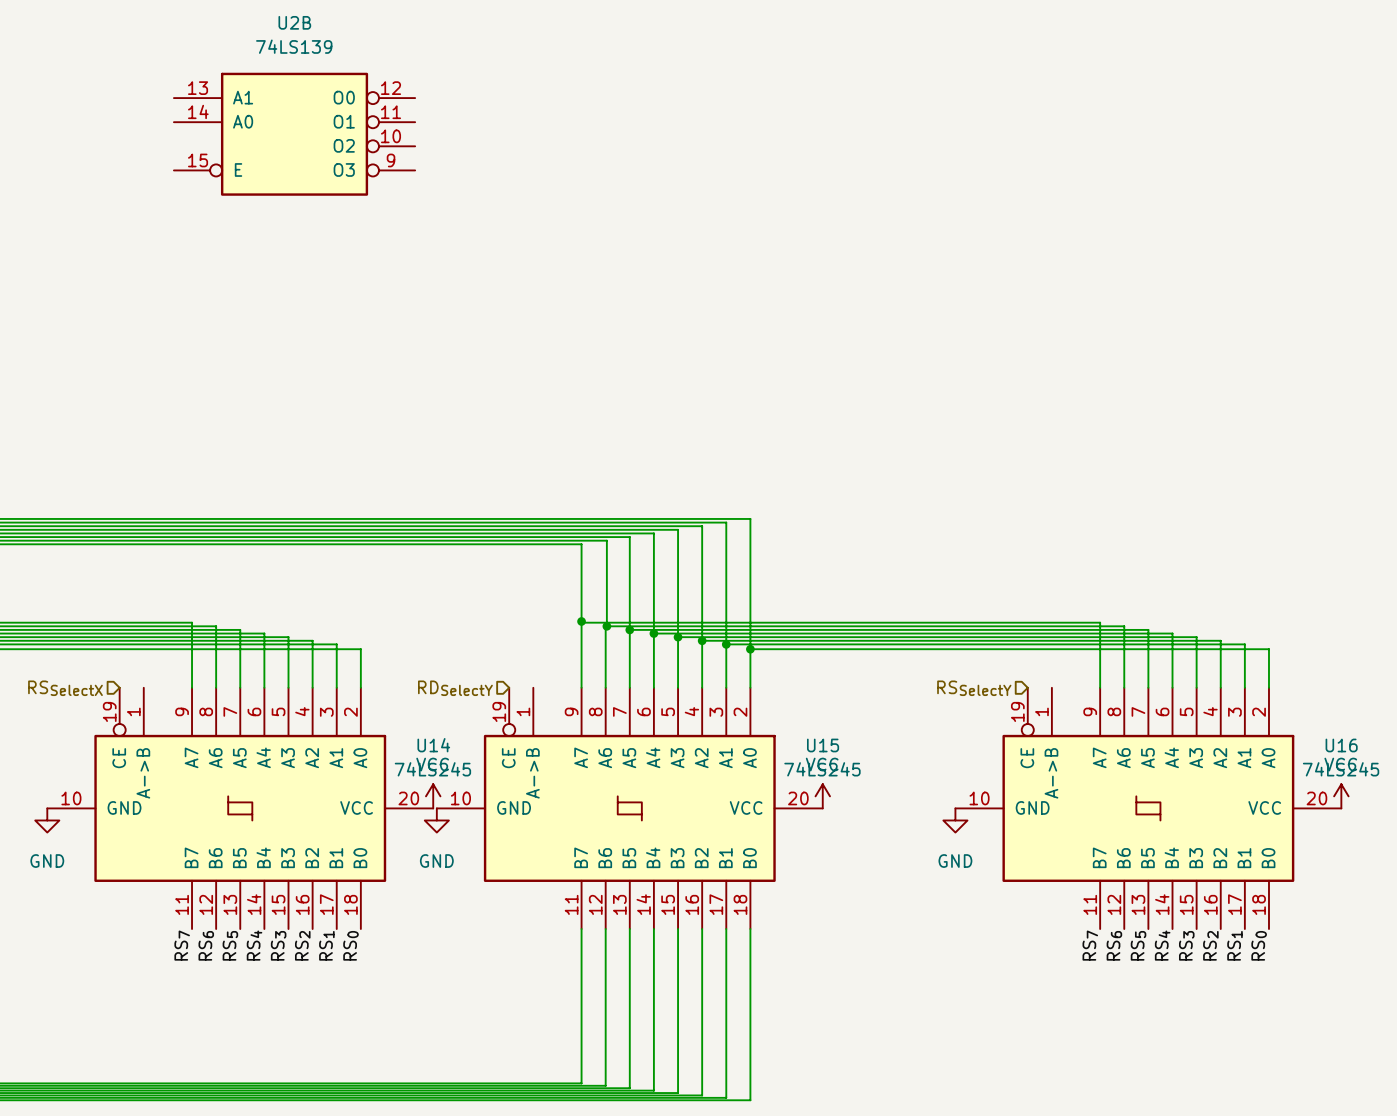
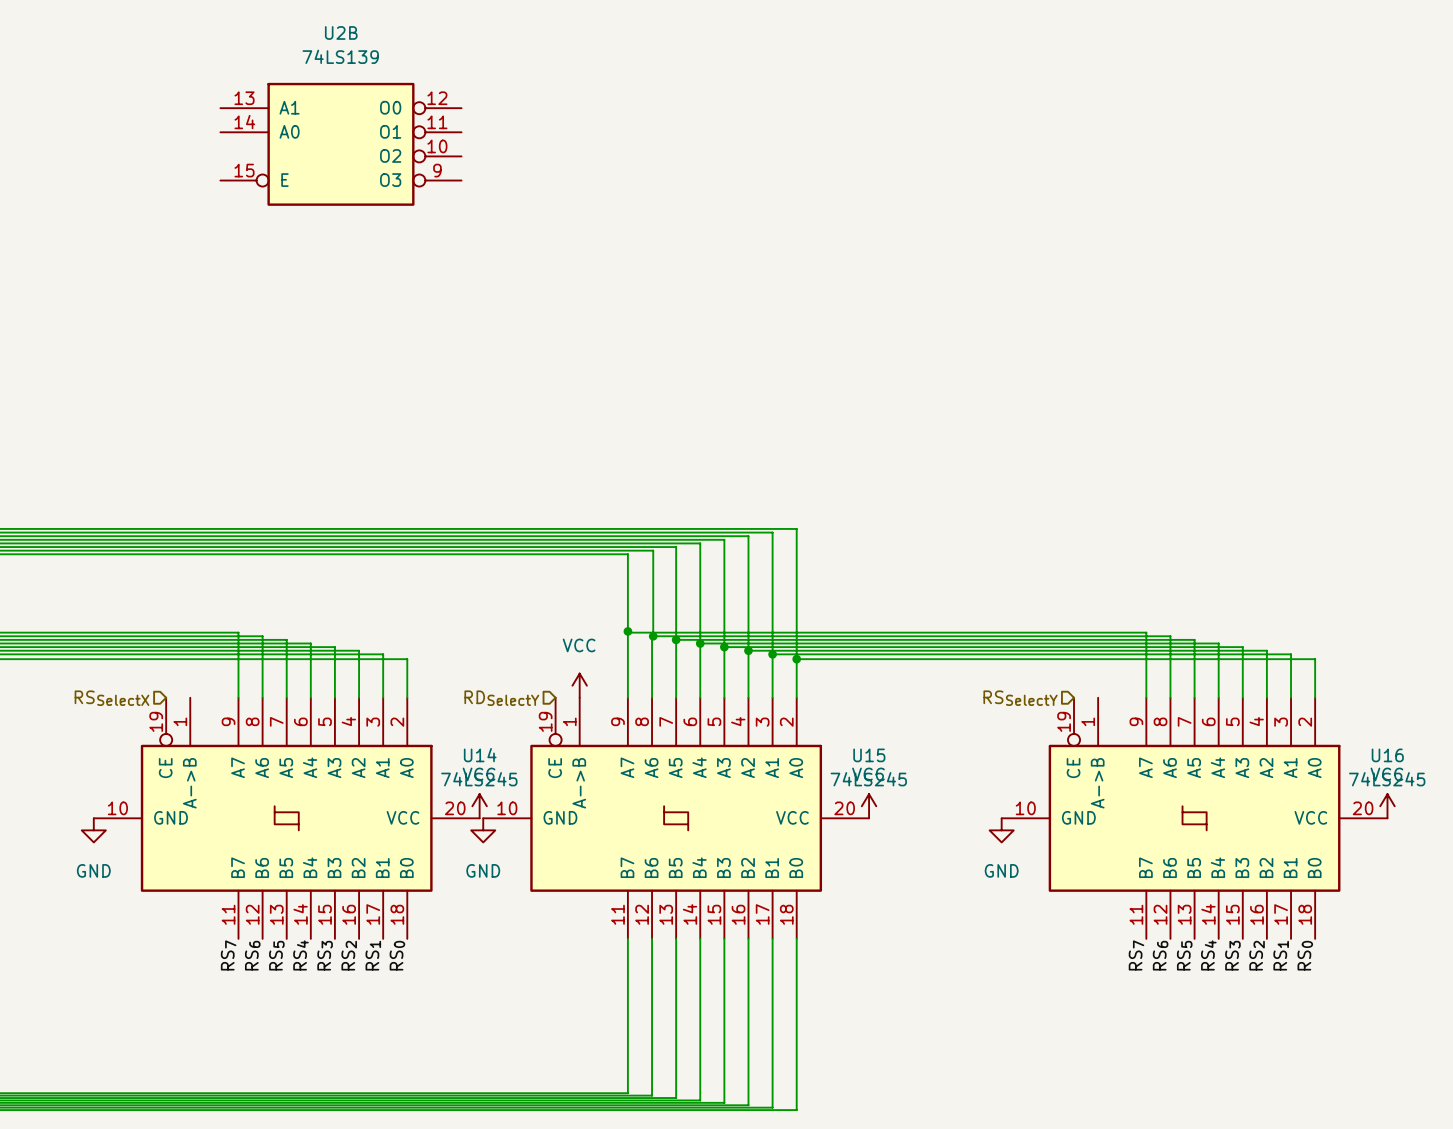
power symbol: none -> VCC (579, 685)

